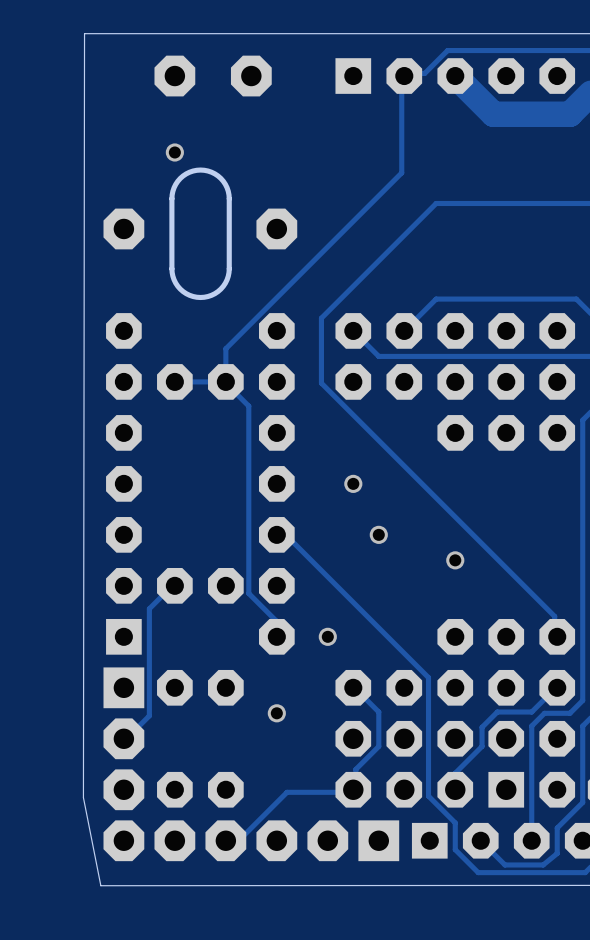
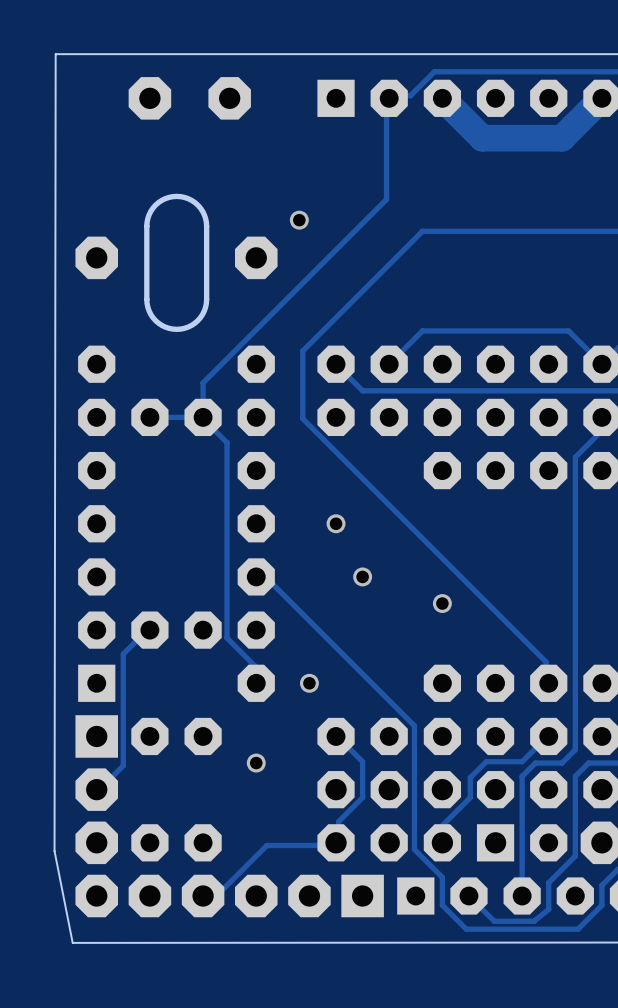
via: (174, 152) -> none
via: none -> (299, 220)

